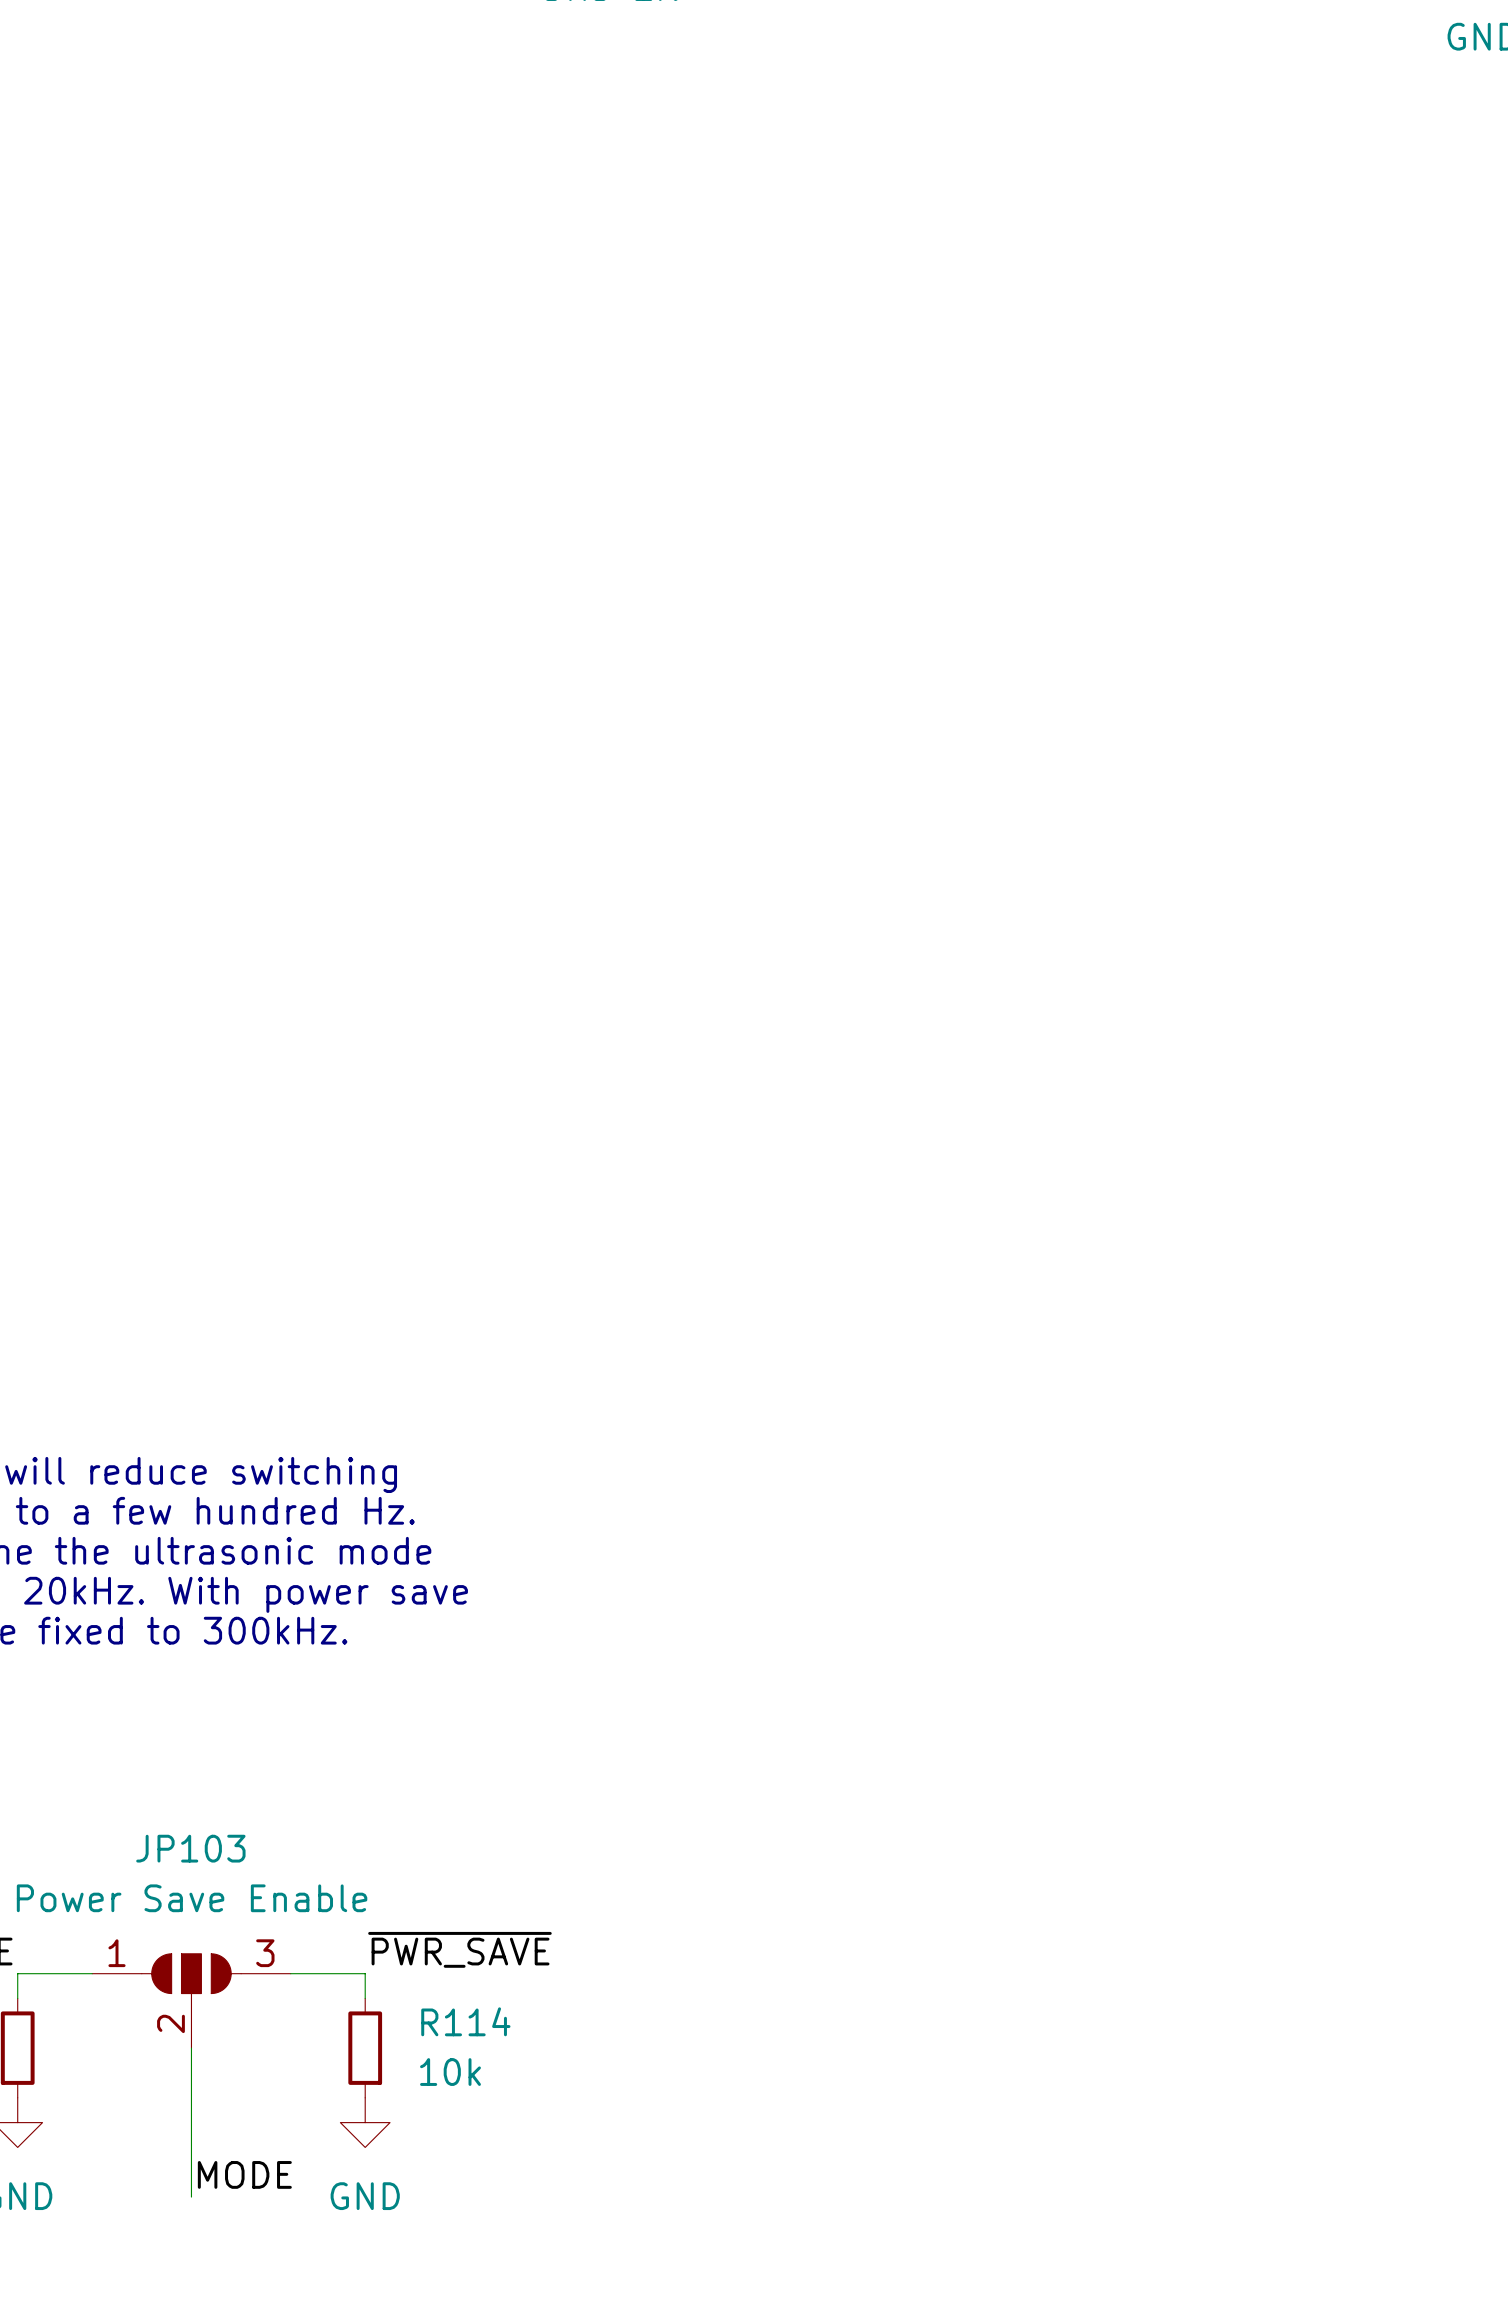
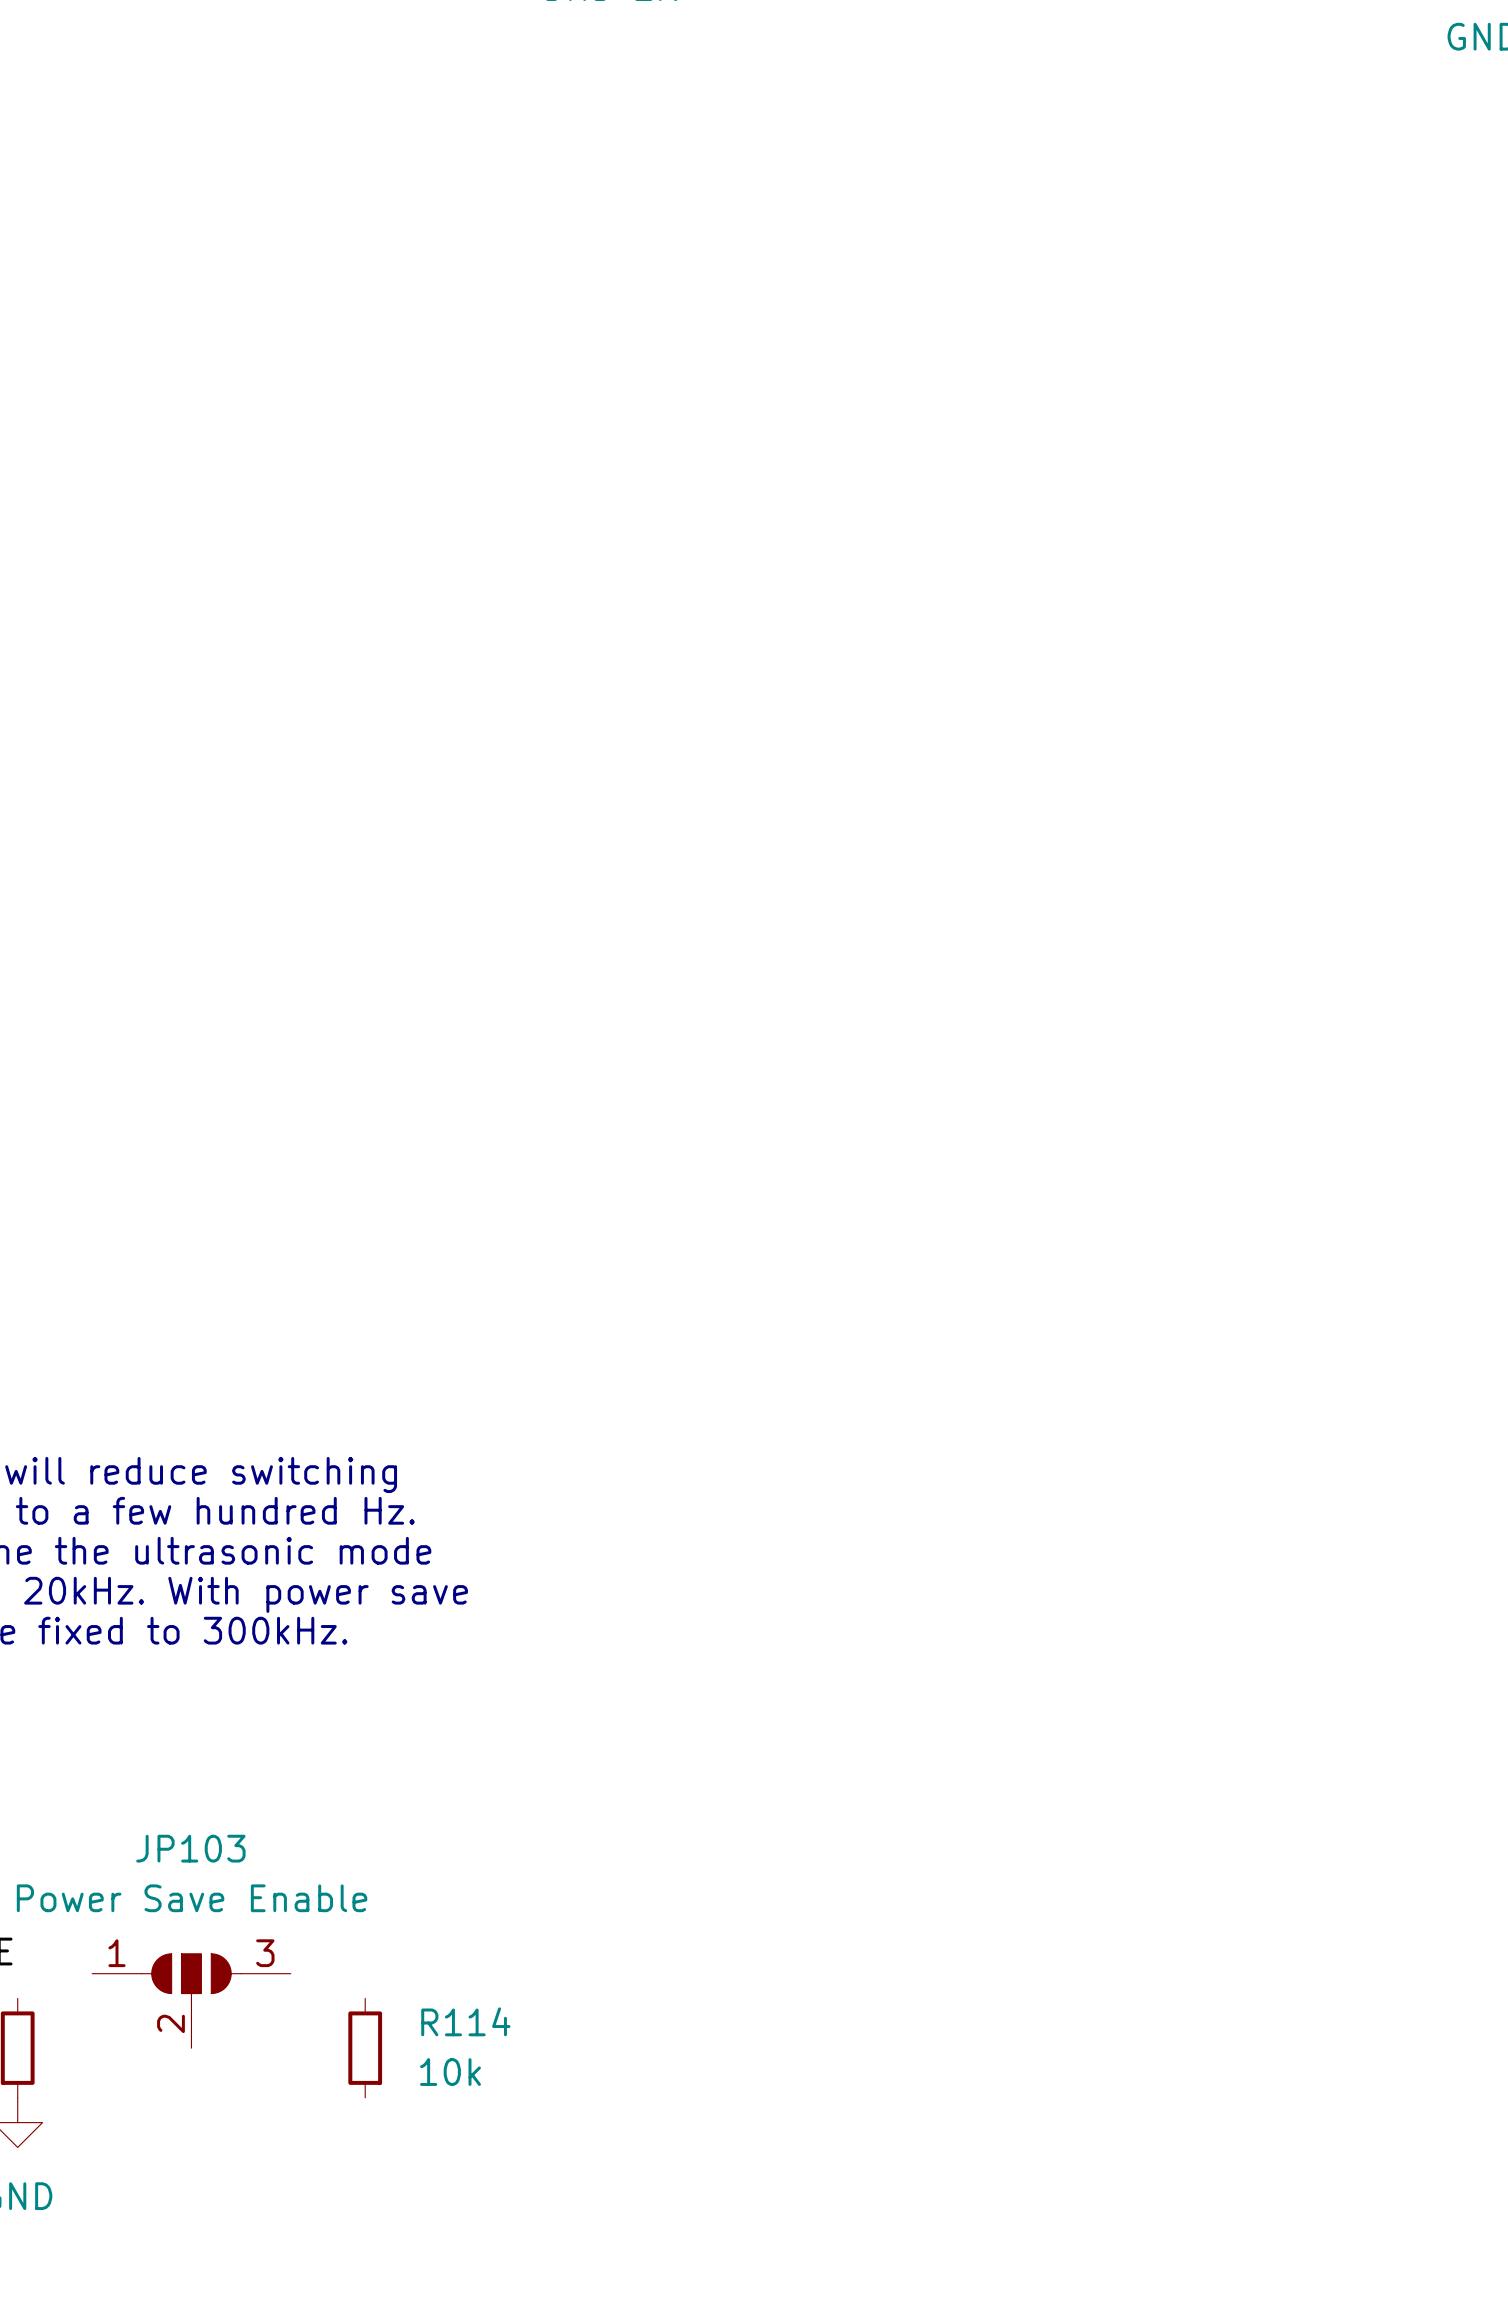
label: ~{PWR_SAVE} (459, 1949) -> none
wire: (92, 1973) (17, 1973) (17, 1998) -> none
wire: (290, 1973) (365, 1973) (365, 1998) -> none
wire: (191, 2048) (191, 2197) -> none
power symbol: GND (365, 2122) -> none
label: MODE (244, 2174) -> none

